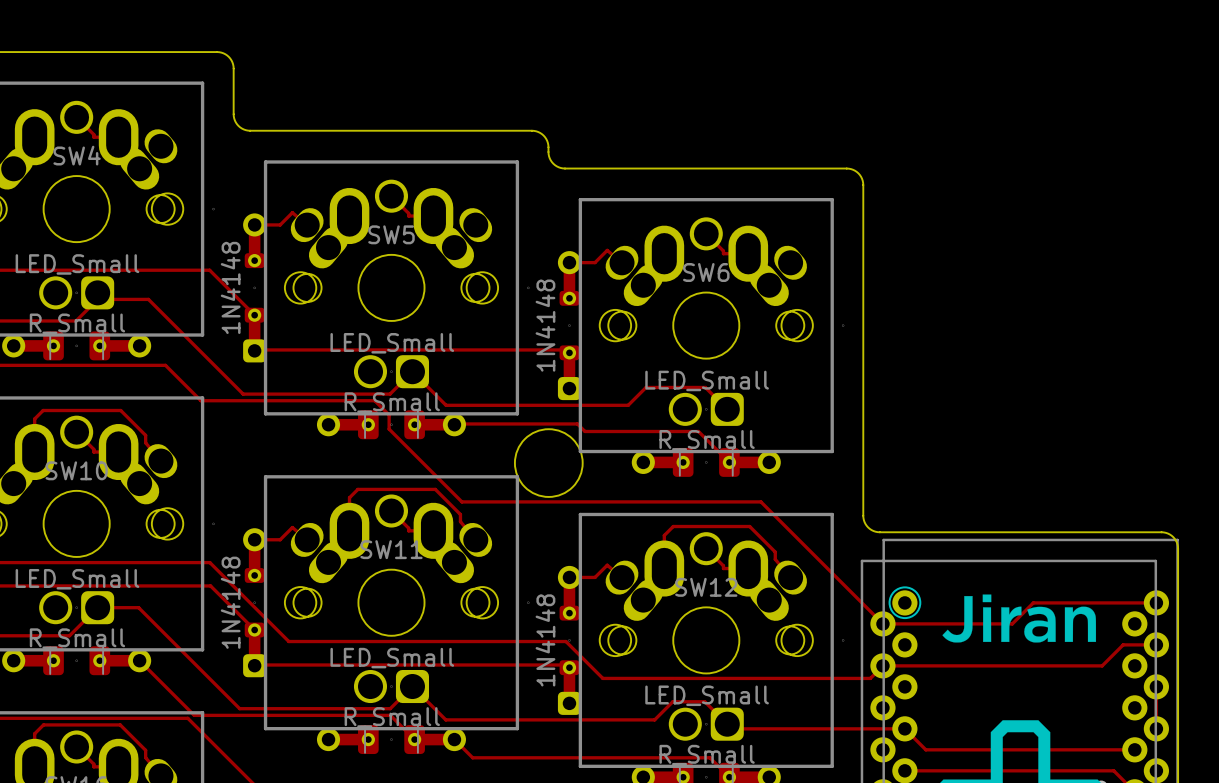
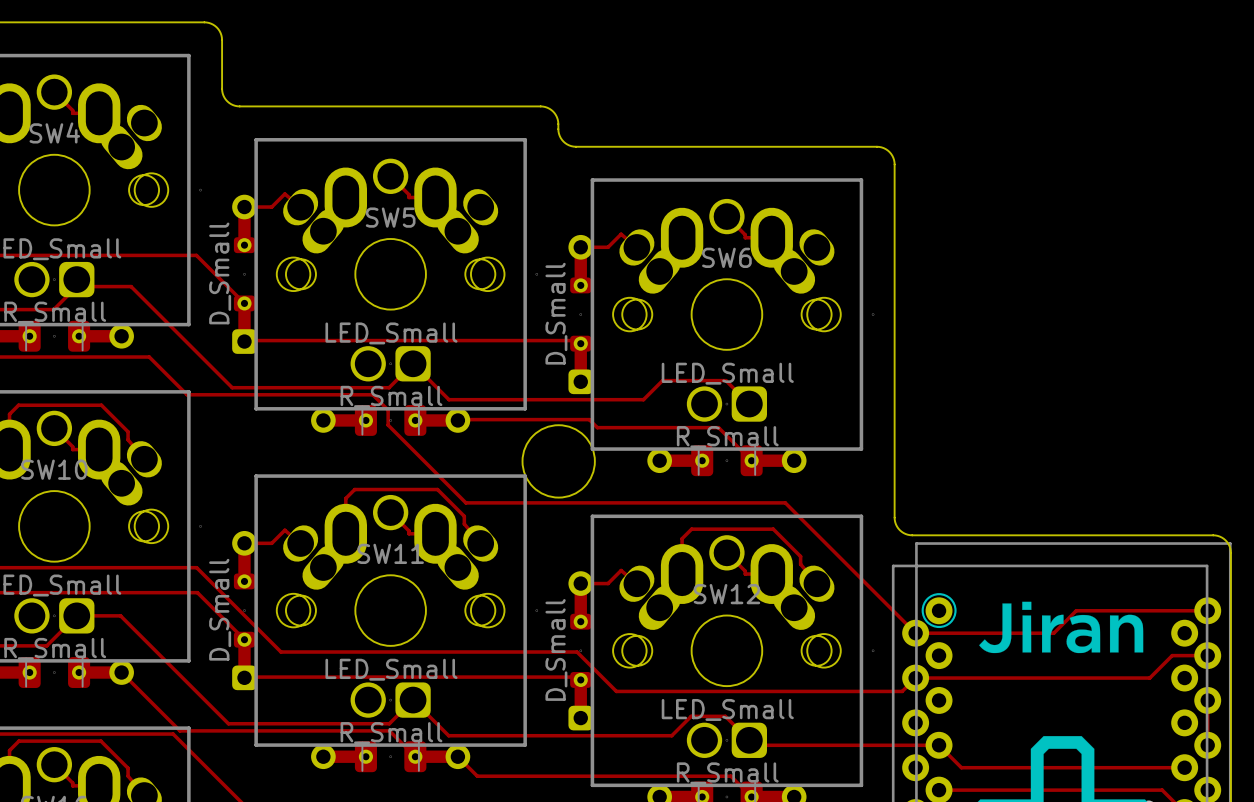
part value: 1N4148 (230, 287) -> D_Small (220, 273)
part value: 1N4148 (545, 325) -> D_Small (556, 313)
part value: 1N4148 (230, 602) -> D_Small (220, 609)
part value: 1N4148 (545, 640) -> D_Small (556, 649)

